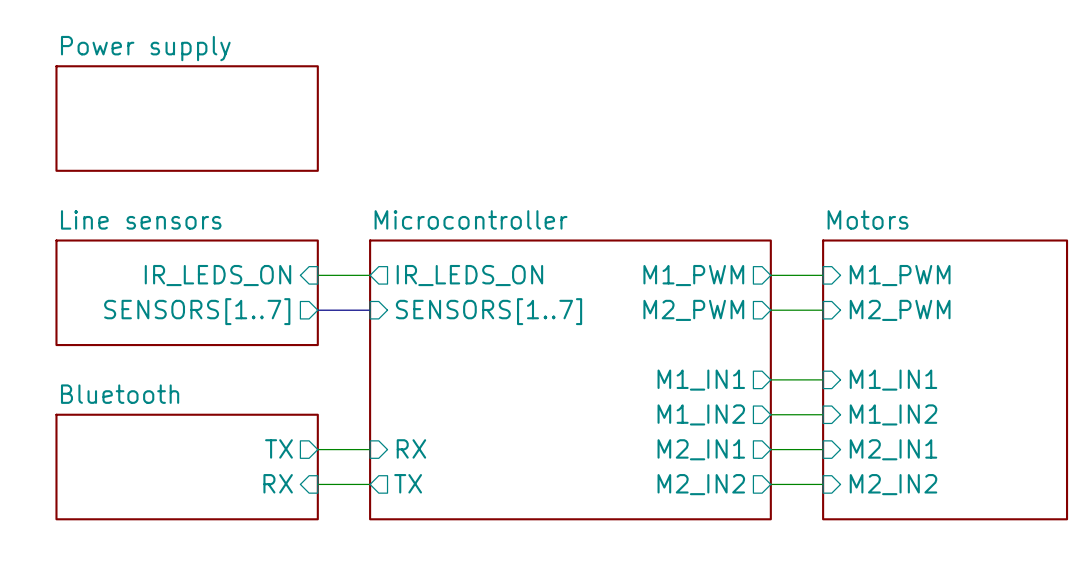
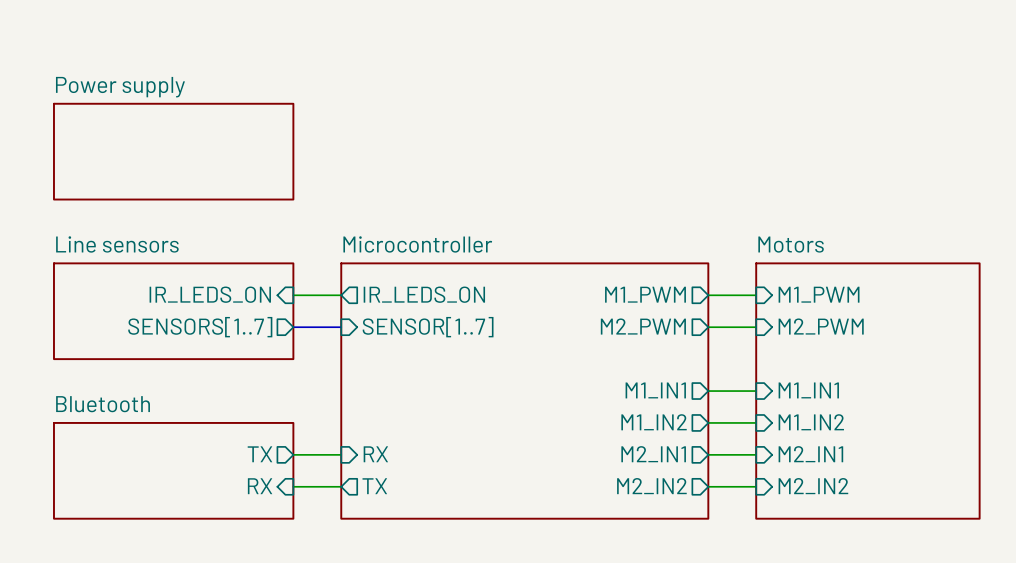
sheet pin: SENSORS[1..7] (489, 311) -> SENSOR[1..7] (428, 327)

